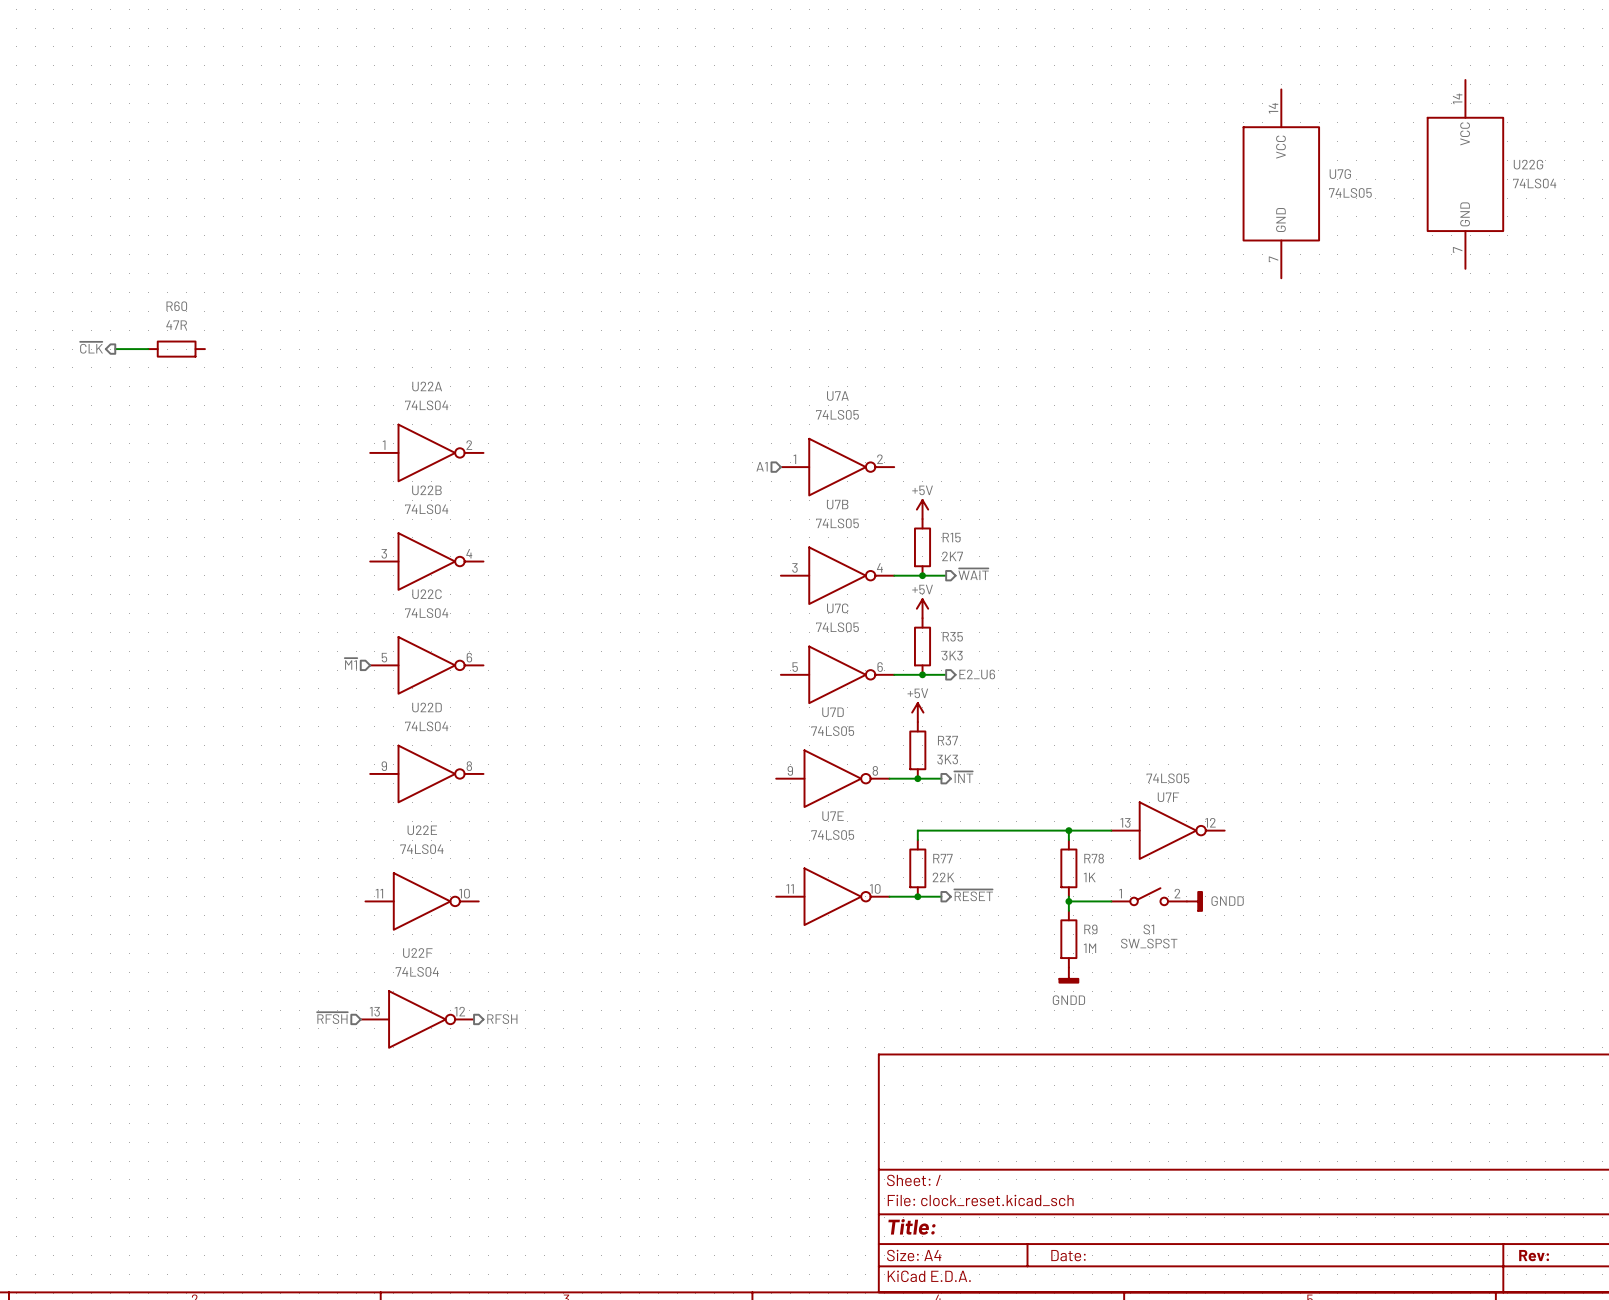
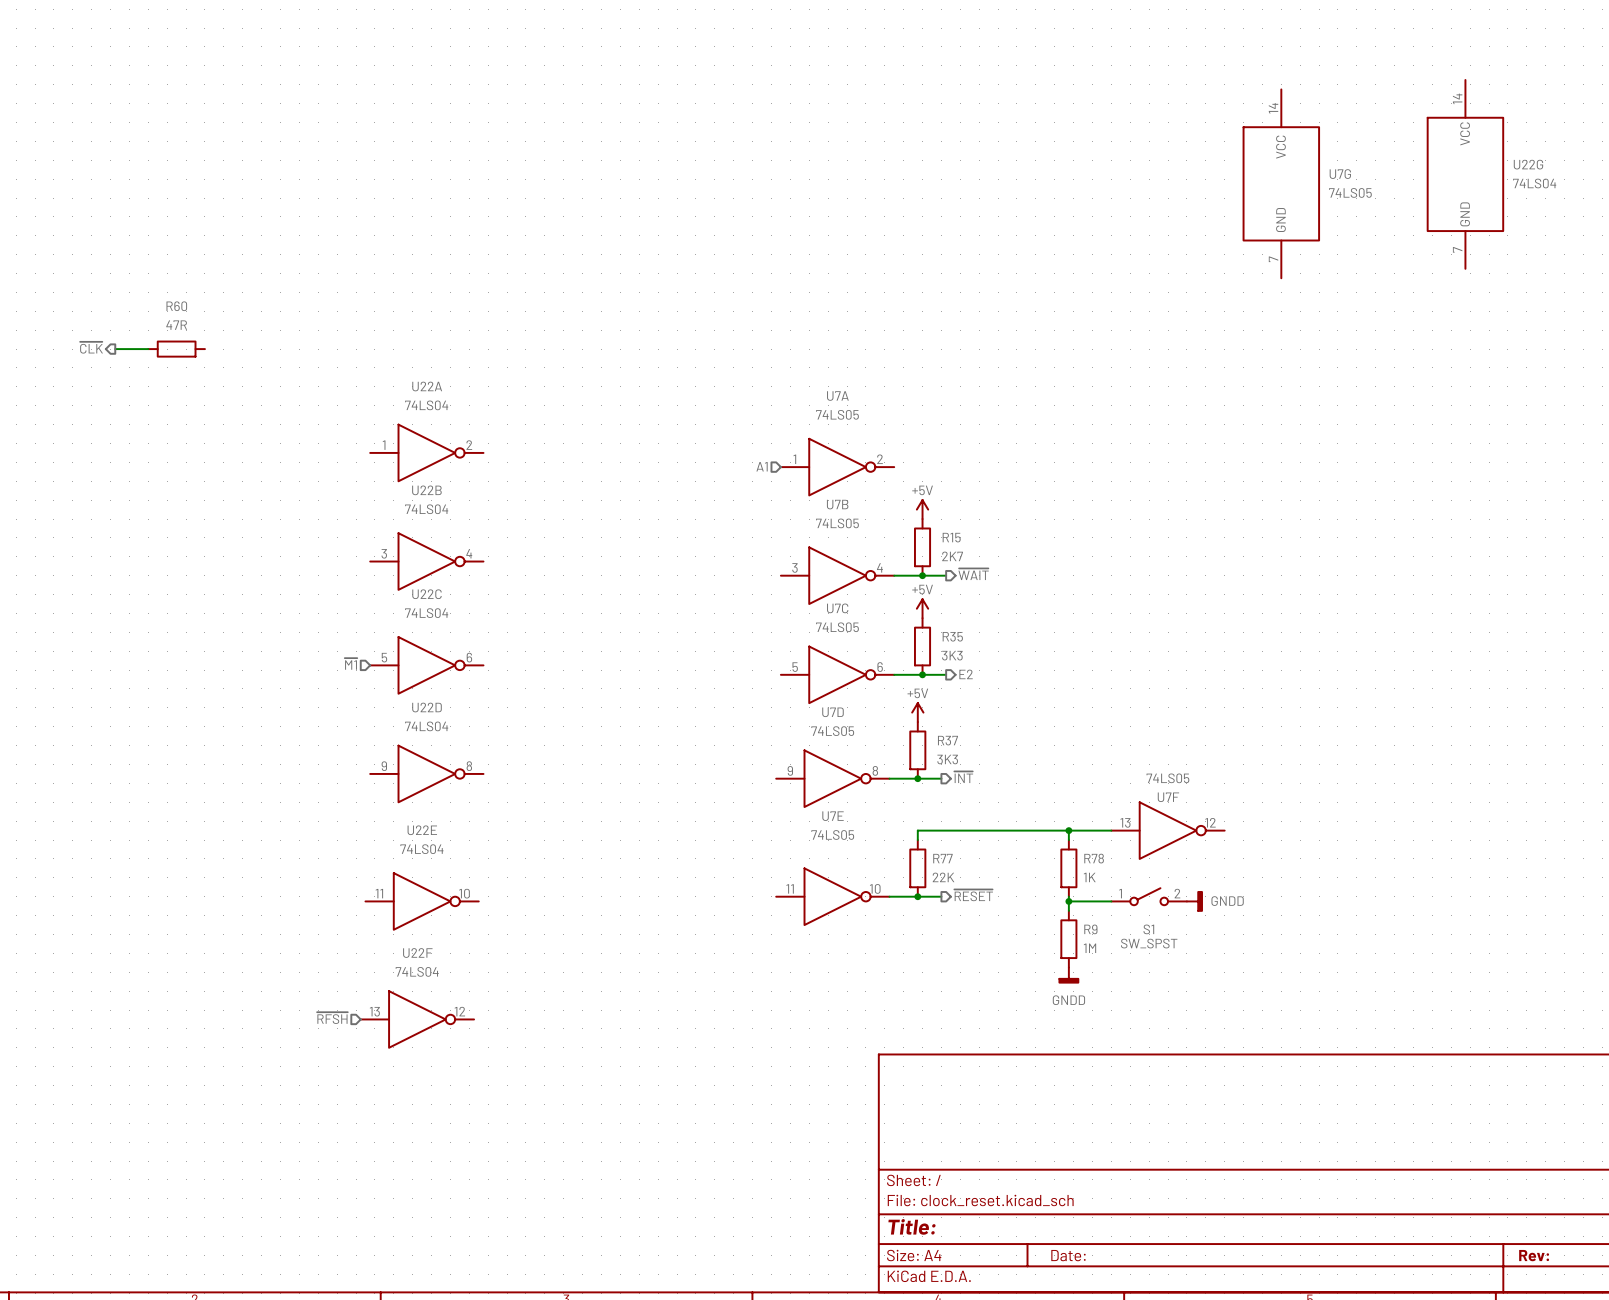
hierarchical label: E2_U6 (977, 674) -> E2 (966, 674)
hierarchical label: RFSH (502, 1019) -> none

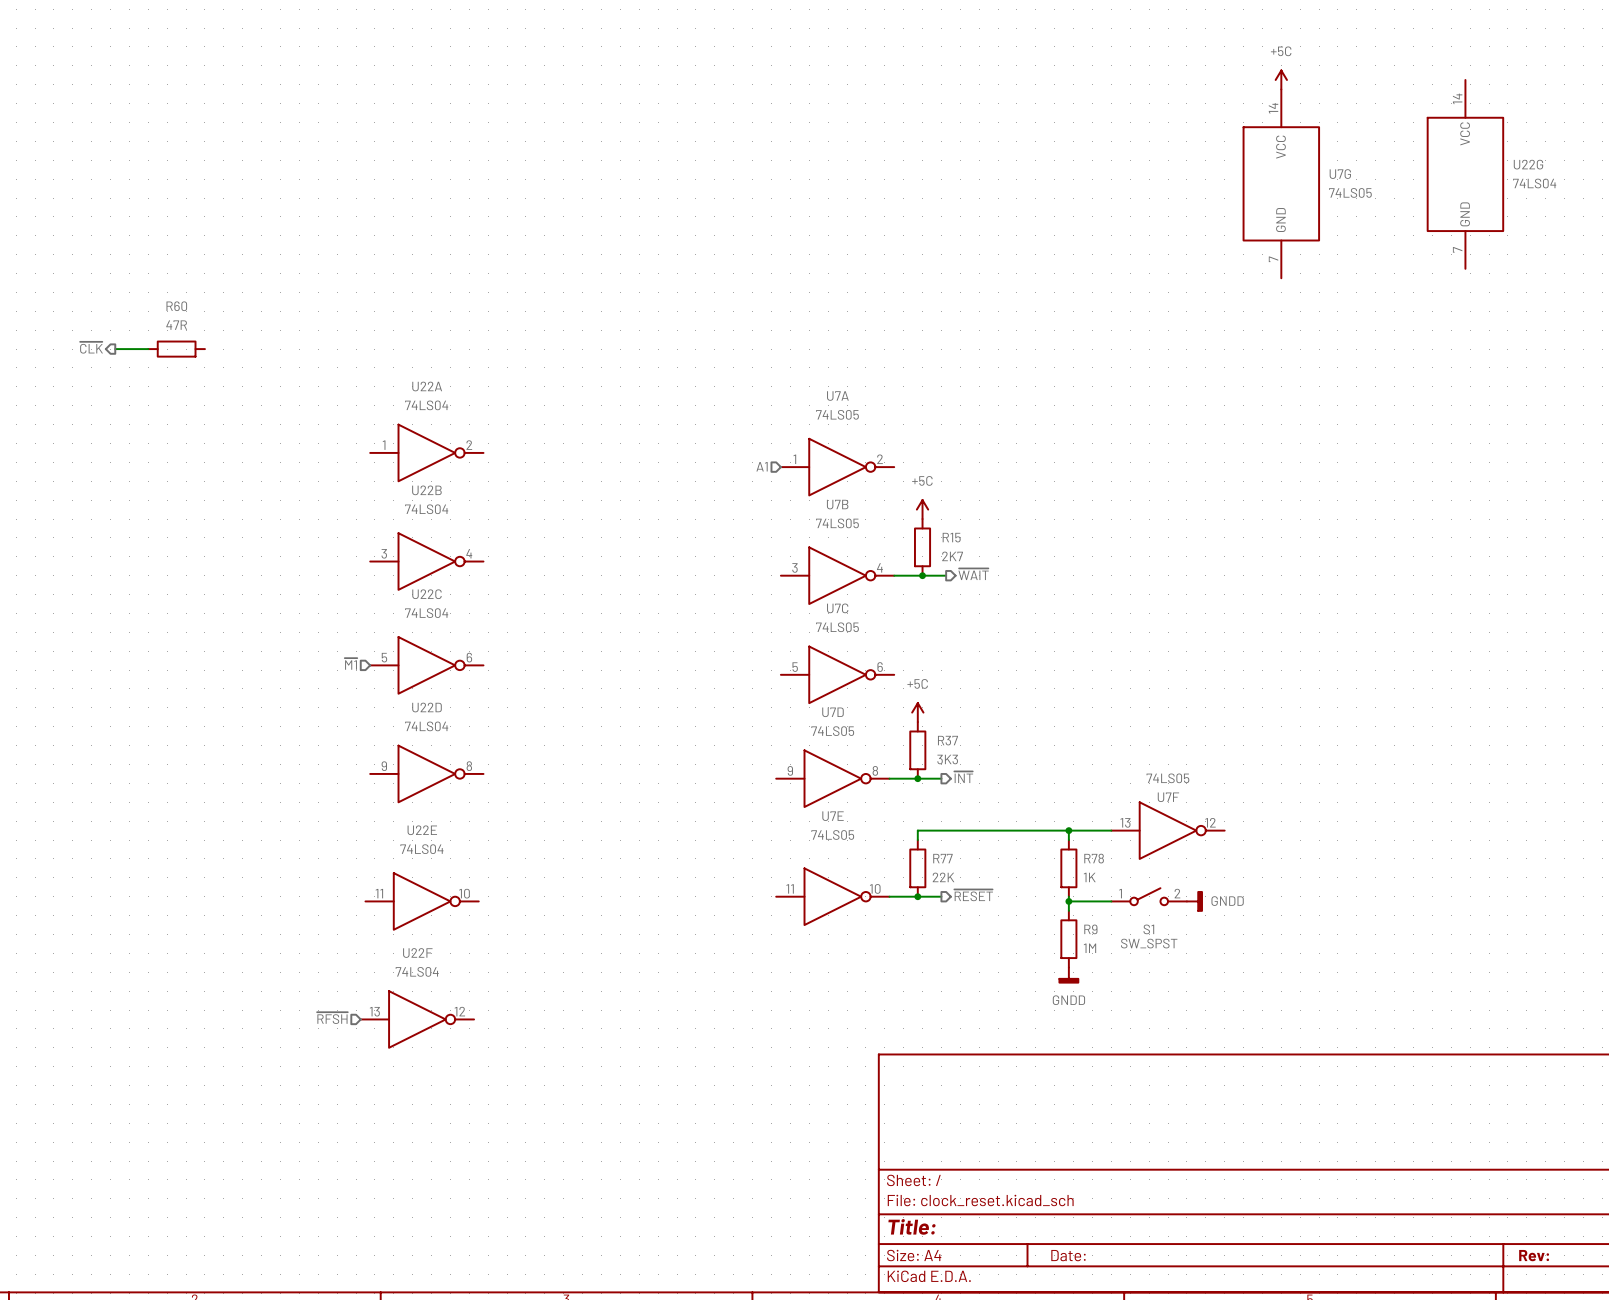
power symbol: none -> +5C (1281, 79)
power symbol: +5V (922, 509) -> +5C (922, 509)
power symbol: +5V (922, 608) -> none
R35: 3K3 (922, 646) -> none
wire: (894, 674) (946, 674) -> none
junction: (922, 674) -> none
hierarchical label: E2 (966, 674) -> none
power symbol: +5V (917, 712) -> +5C (917, 712)

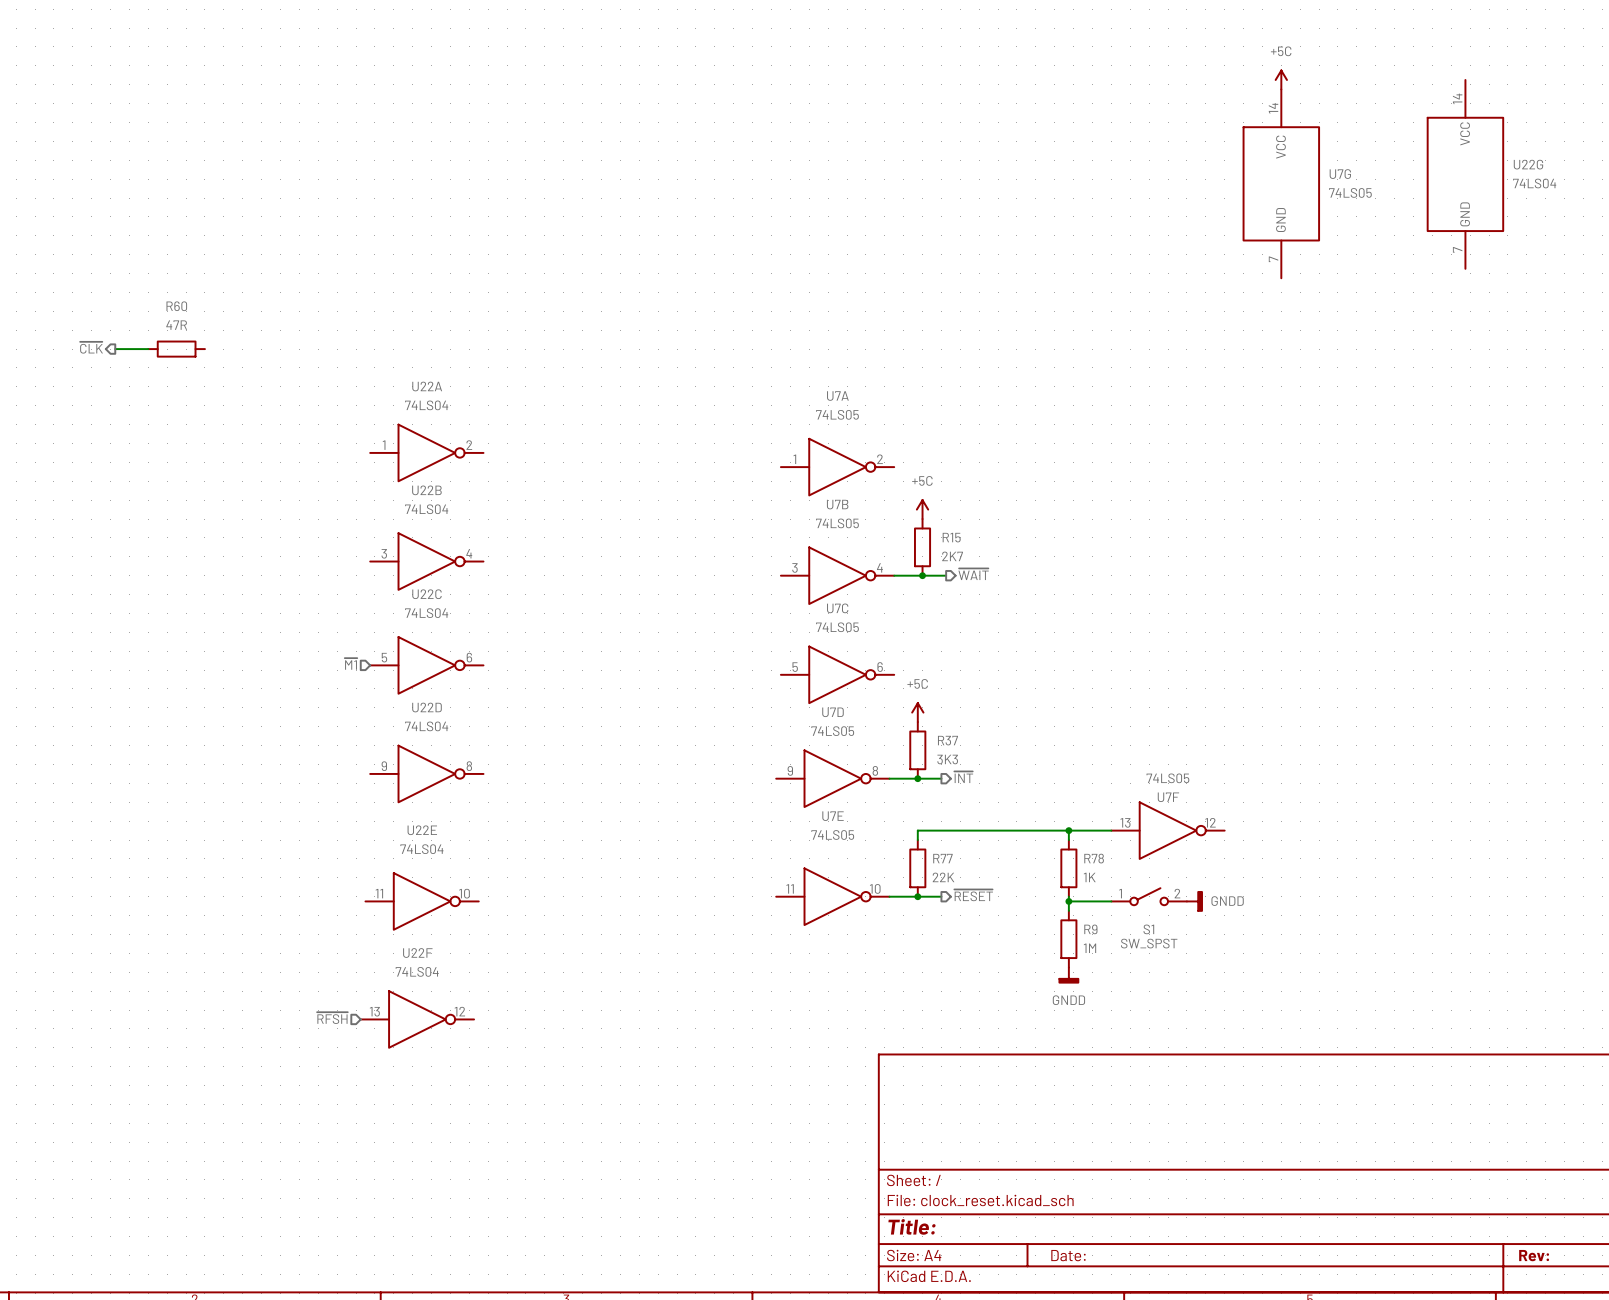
hierarchical label: A1 (762, 466) -> none

